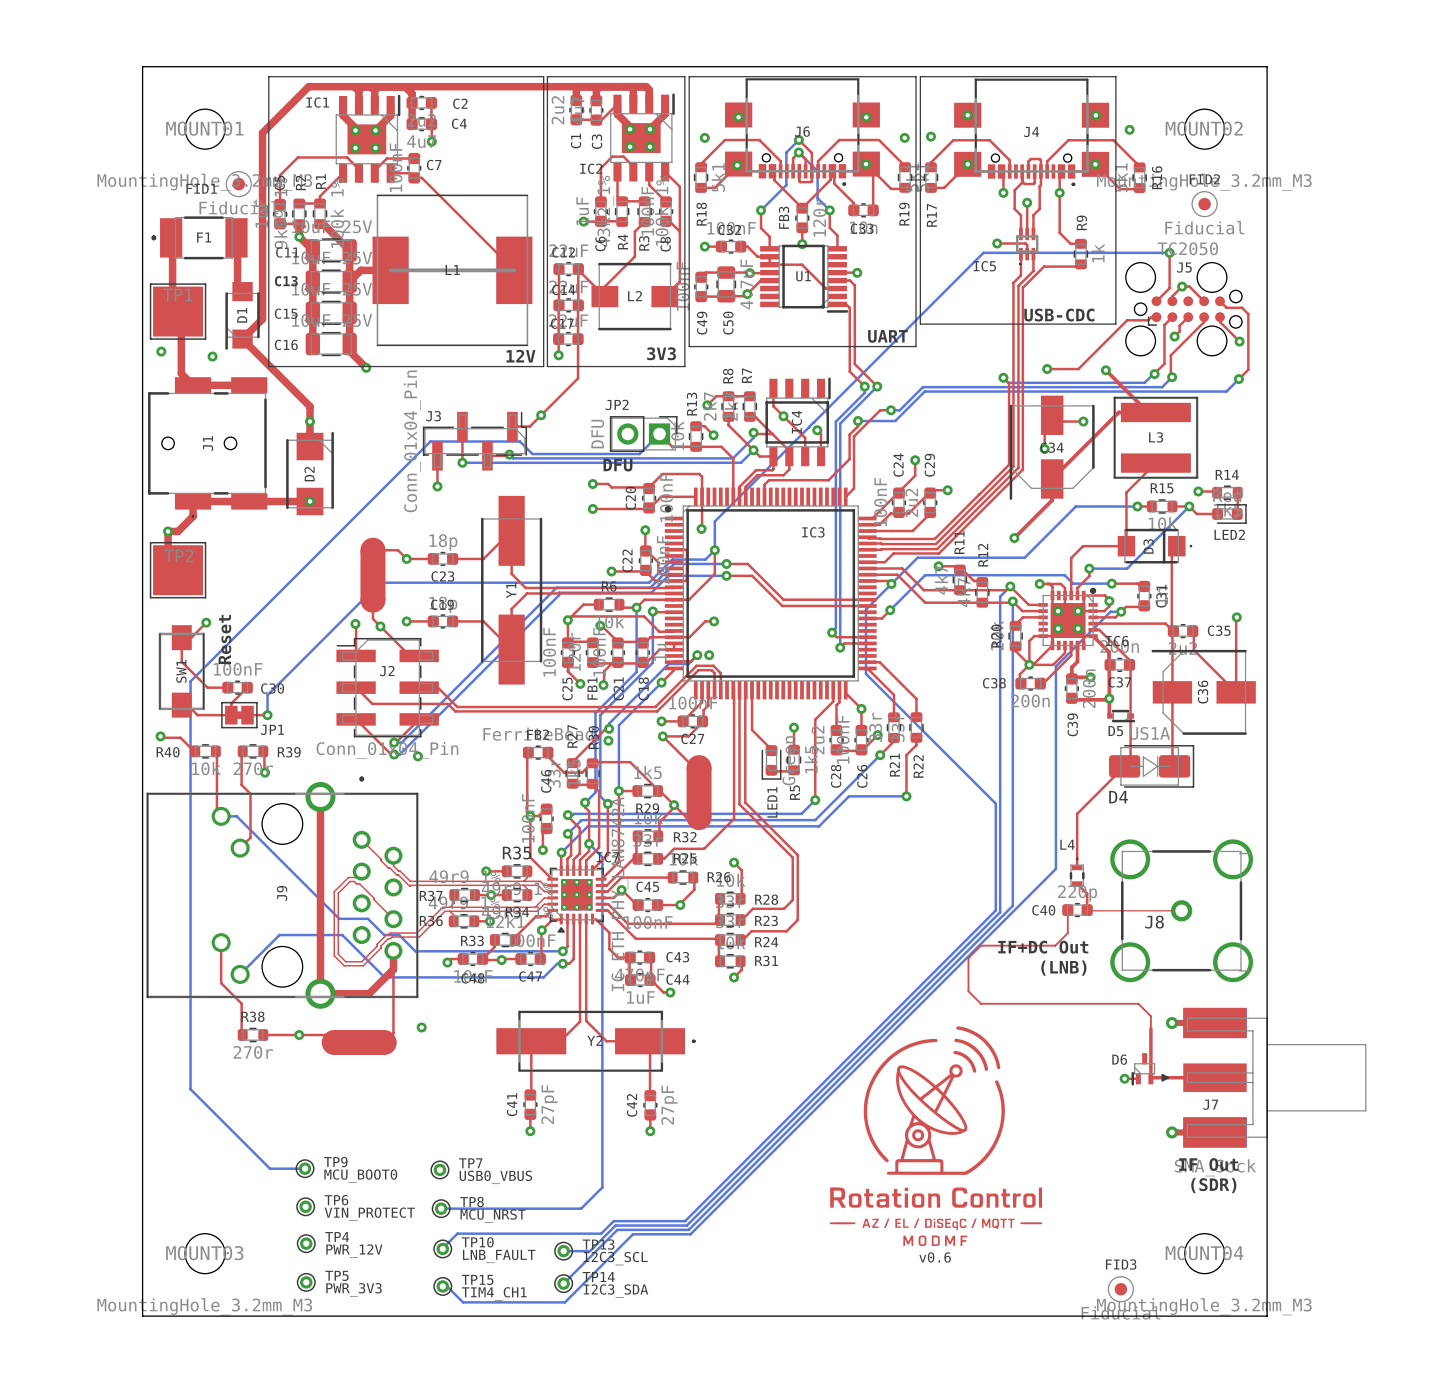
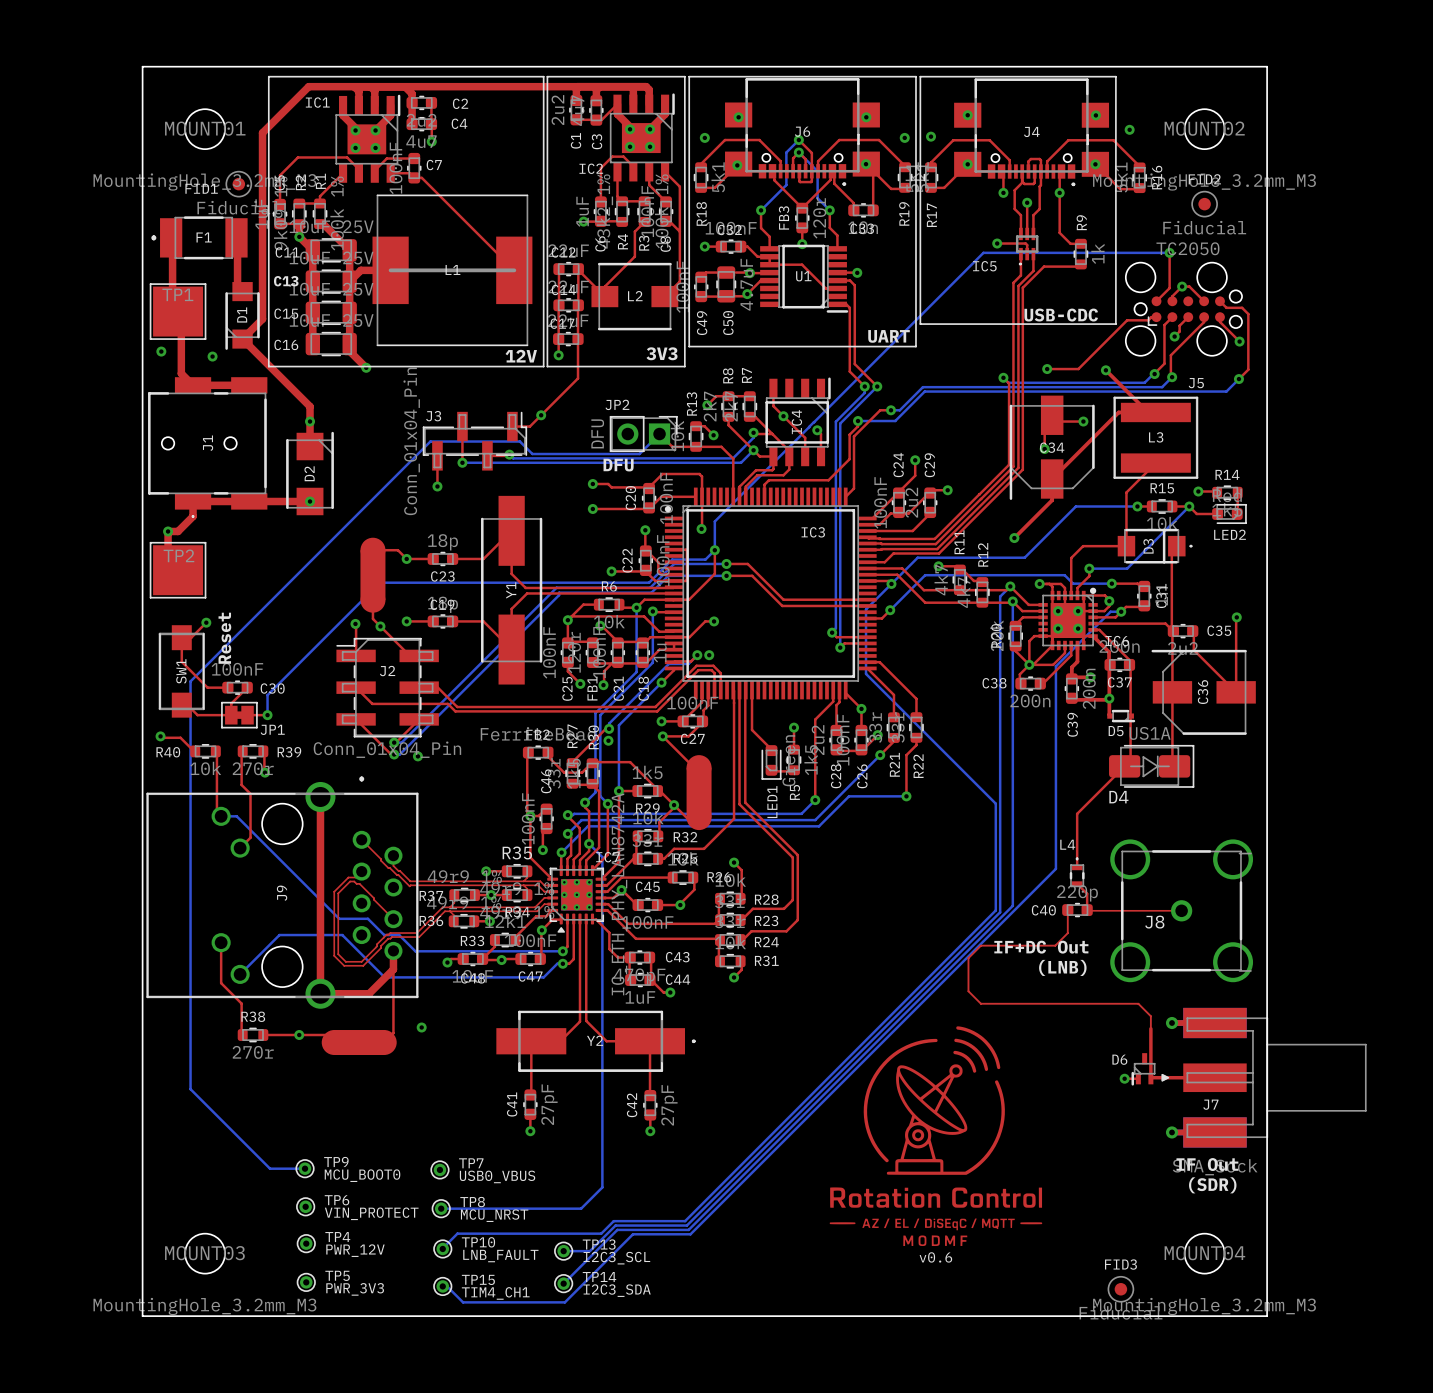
J5 name position: J5 (1184, 267) -> J5 (1196, 383)

